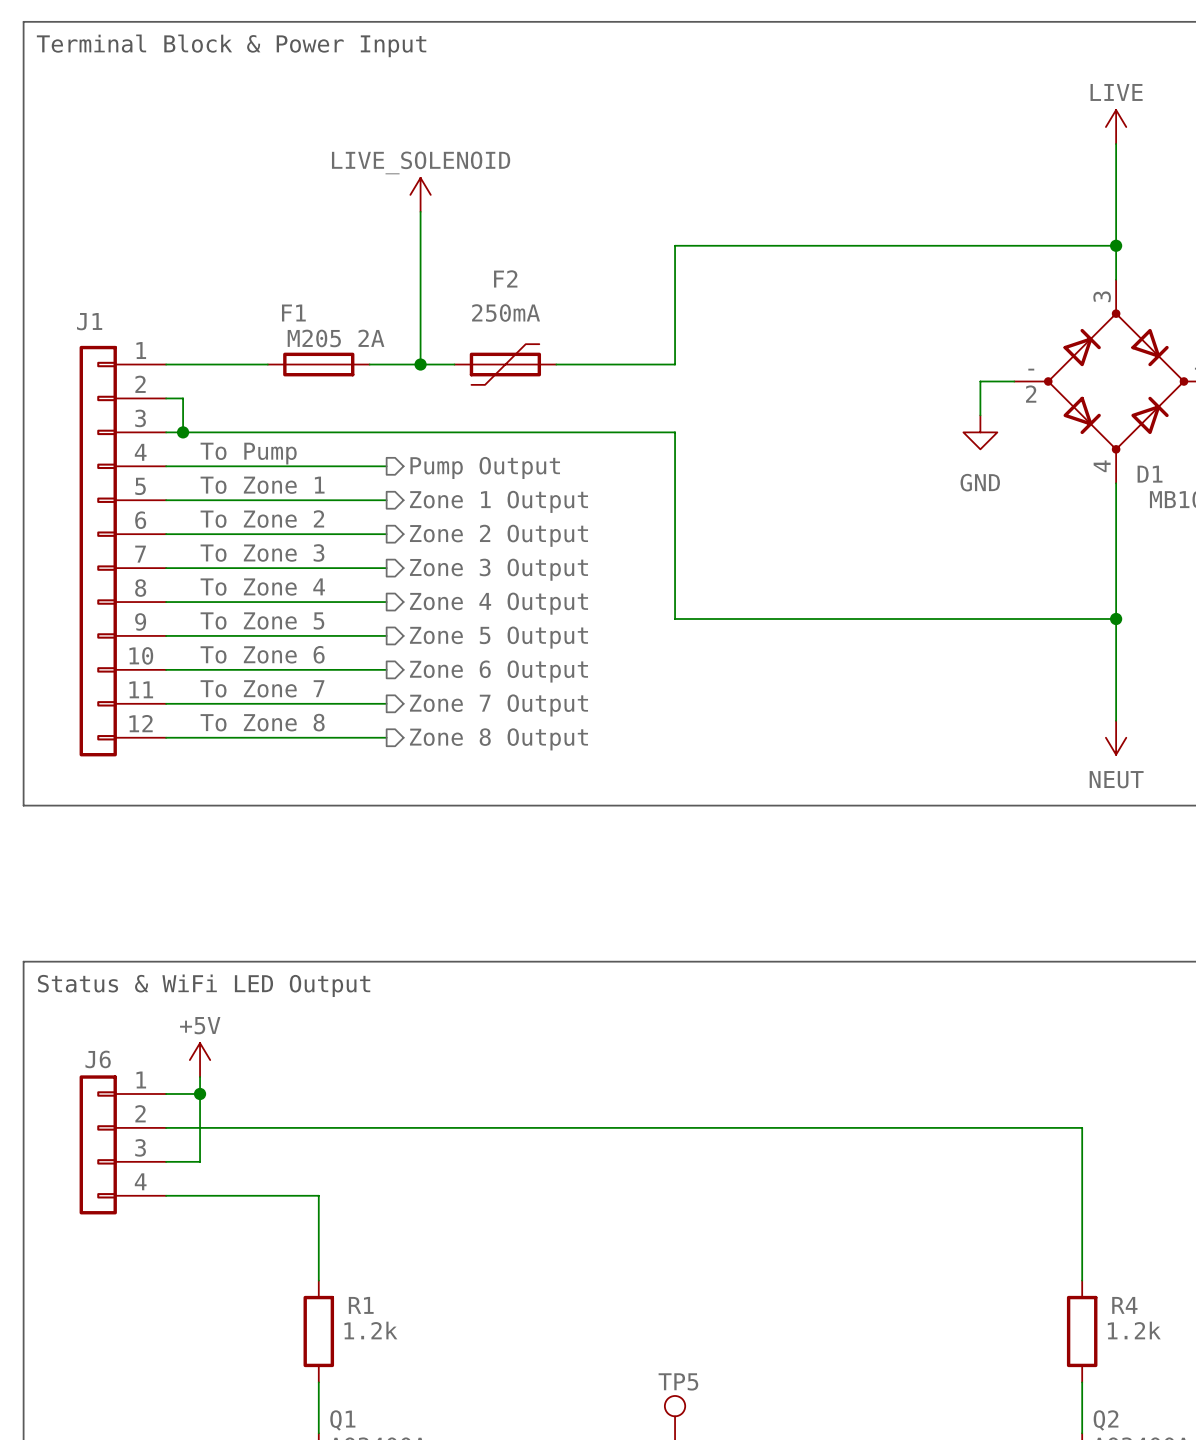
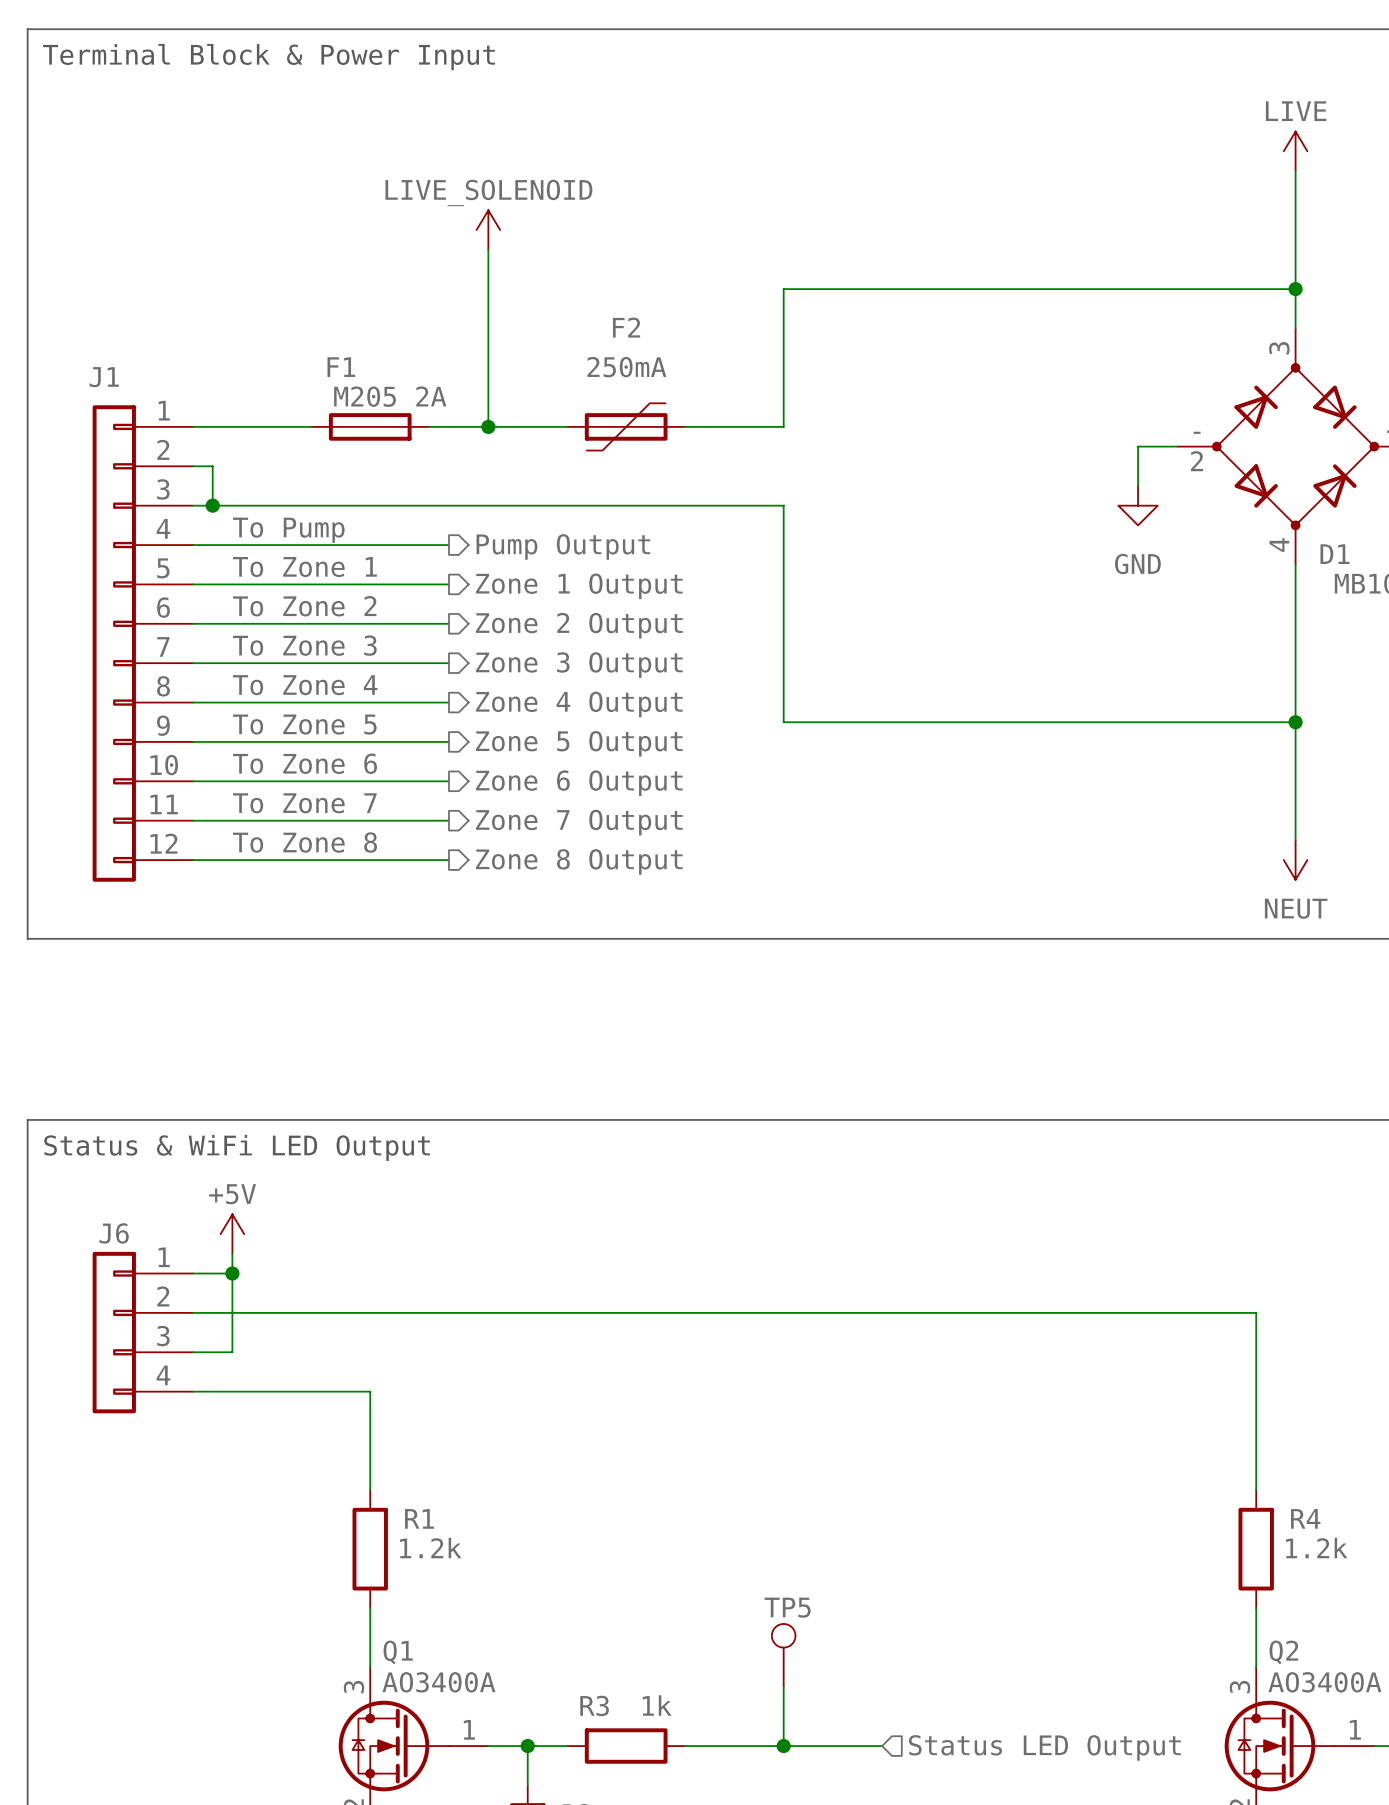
F2 position: (505, 364) -> (626, 426)

